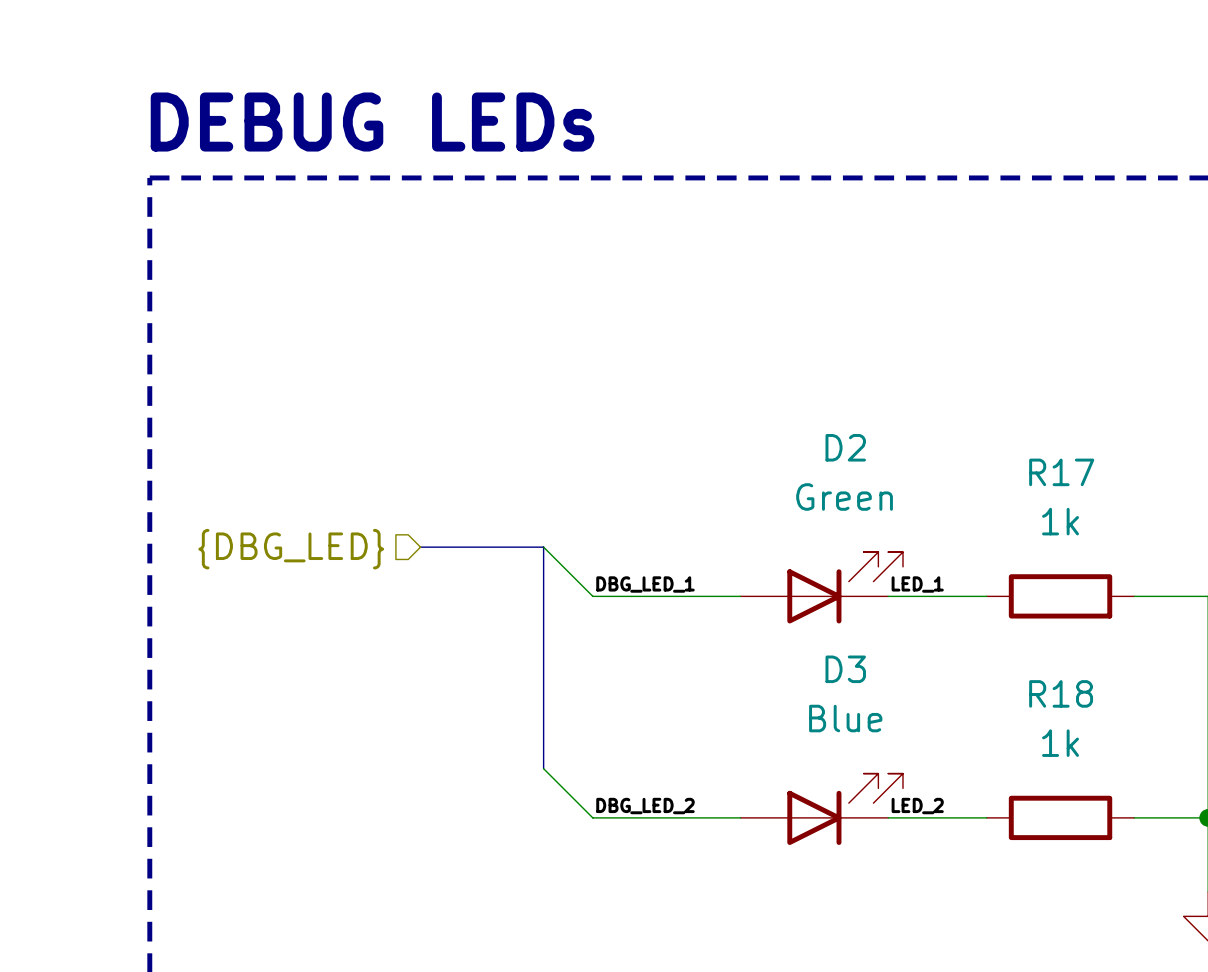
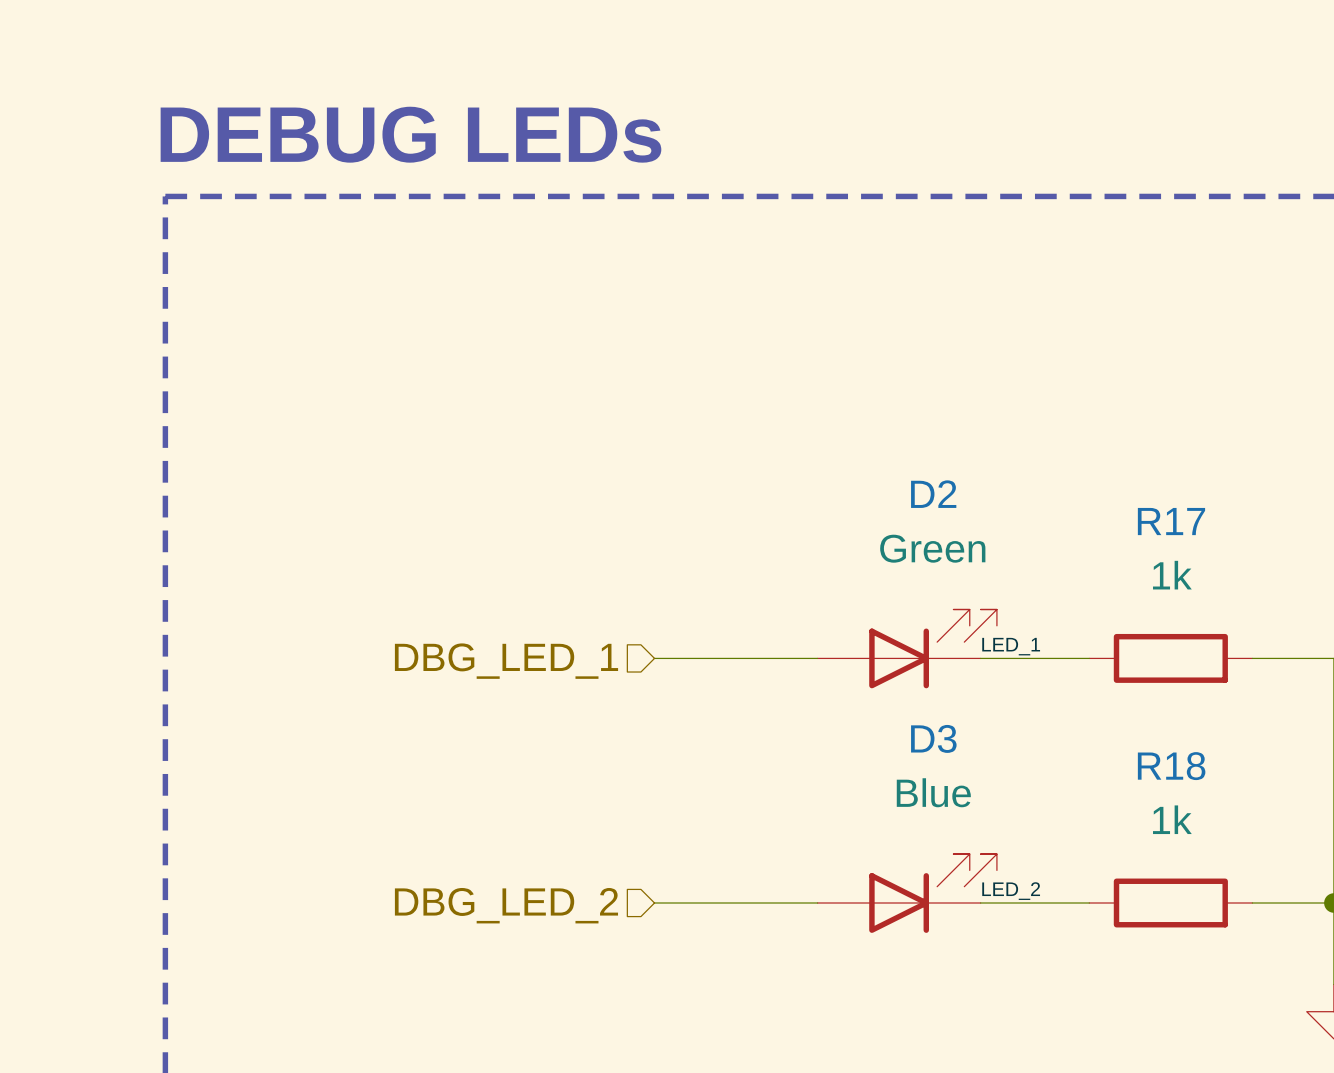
bus: (420, 547) (543, 547) (543, 768) -> none
wire: (543, 547) (592, 596) -> none
hierarchical label: {DBG_LED} (291, 549) -> DBG_LED_1 (506, 661)
label: DBG_LED_1 (645, 584) -> none
wire: (543, 768) (592, 817) -> none
label: DBG_LED_2 (645, 806) -> none
hierarchical label: none -> DBG_LED_2 (506, 905)

